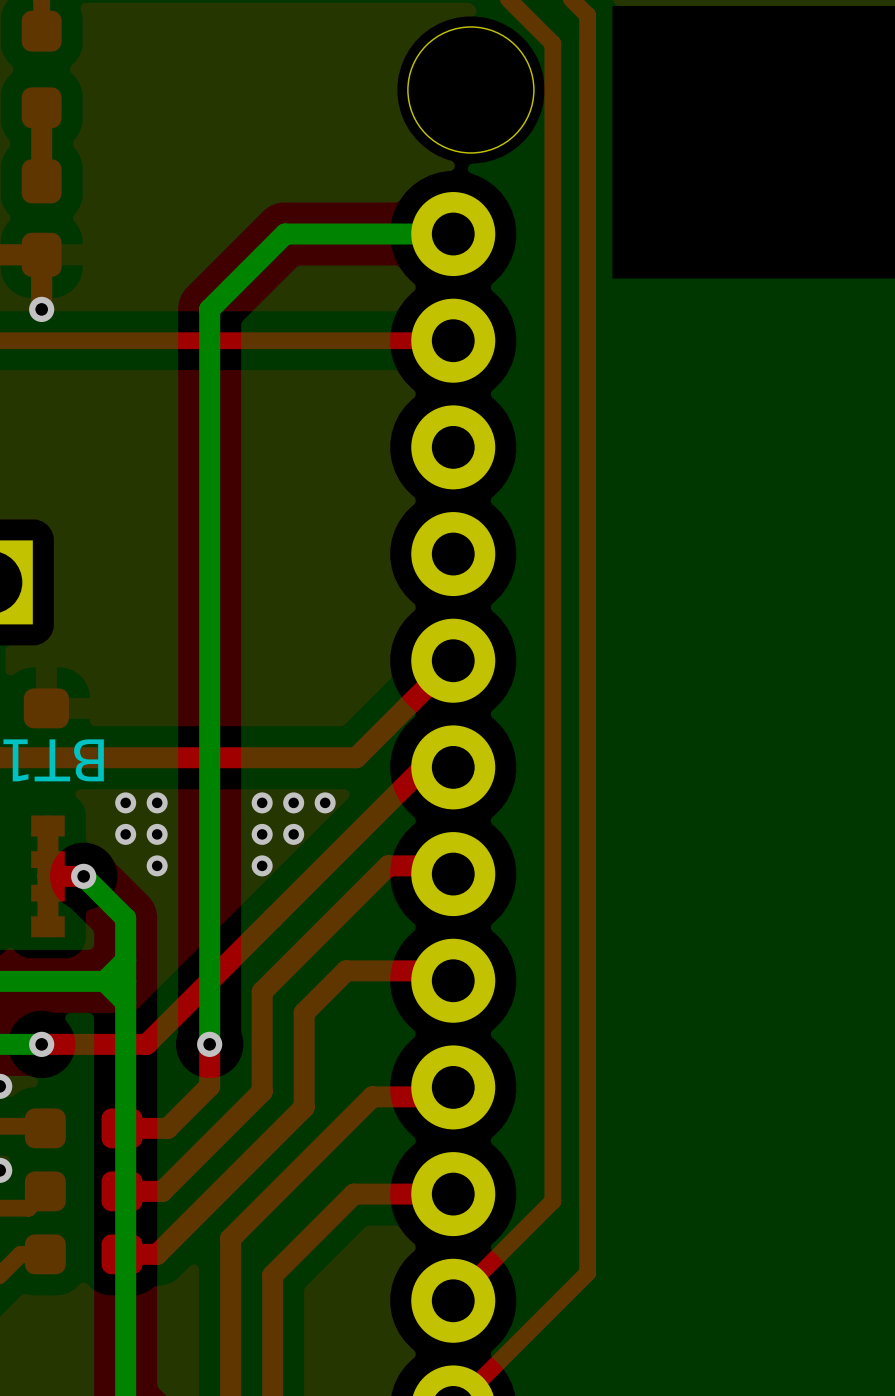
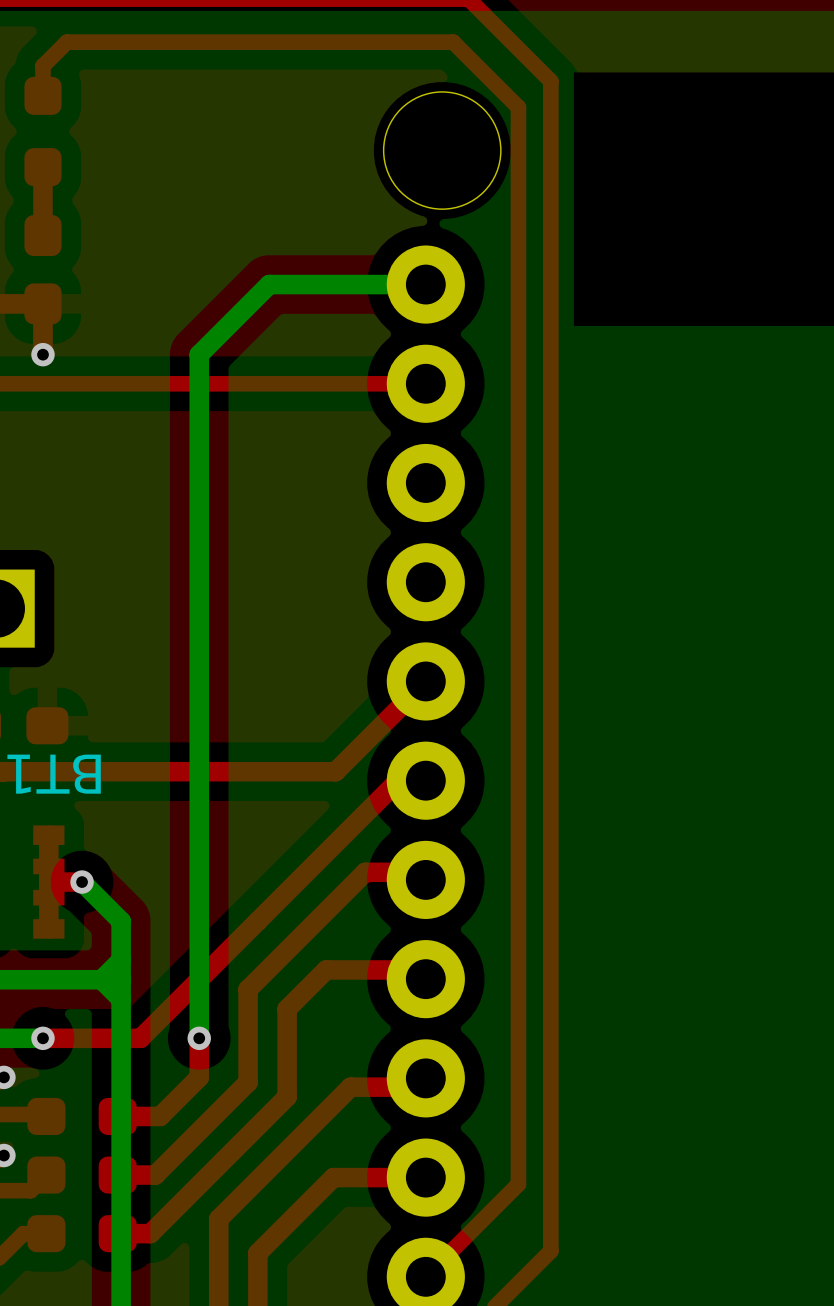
via: (125, 802) -> none
via: (157, 802) -> none
via: (262, 802) -> none
via: (293, 802) -> none
via: (325, 802) -> none
via: (125, 834) -> none
via: (157, 834) -> none
via: (262, 834) -> none
via: (293, 834) -> none
via: (157, 865) -> none
via: (262, 865) -> none

